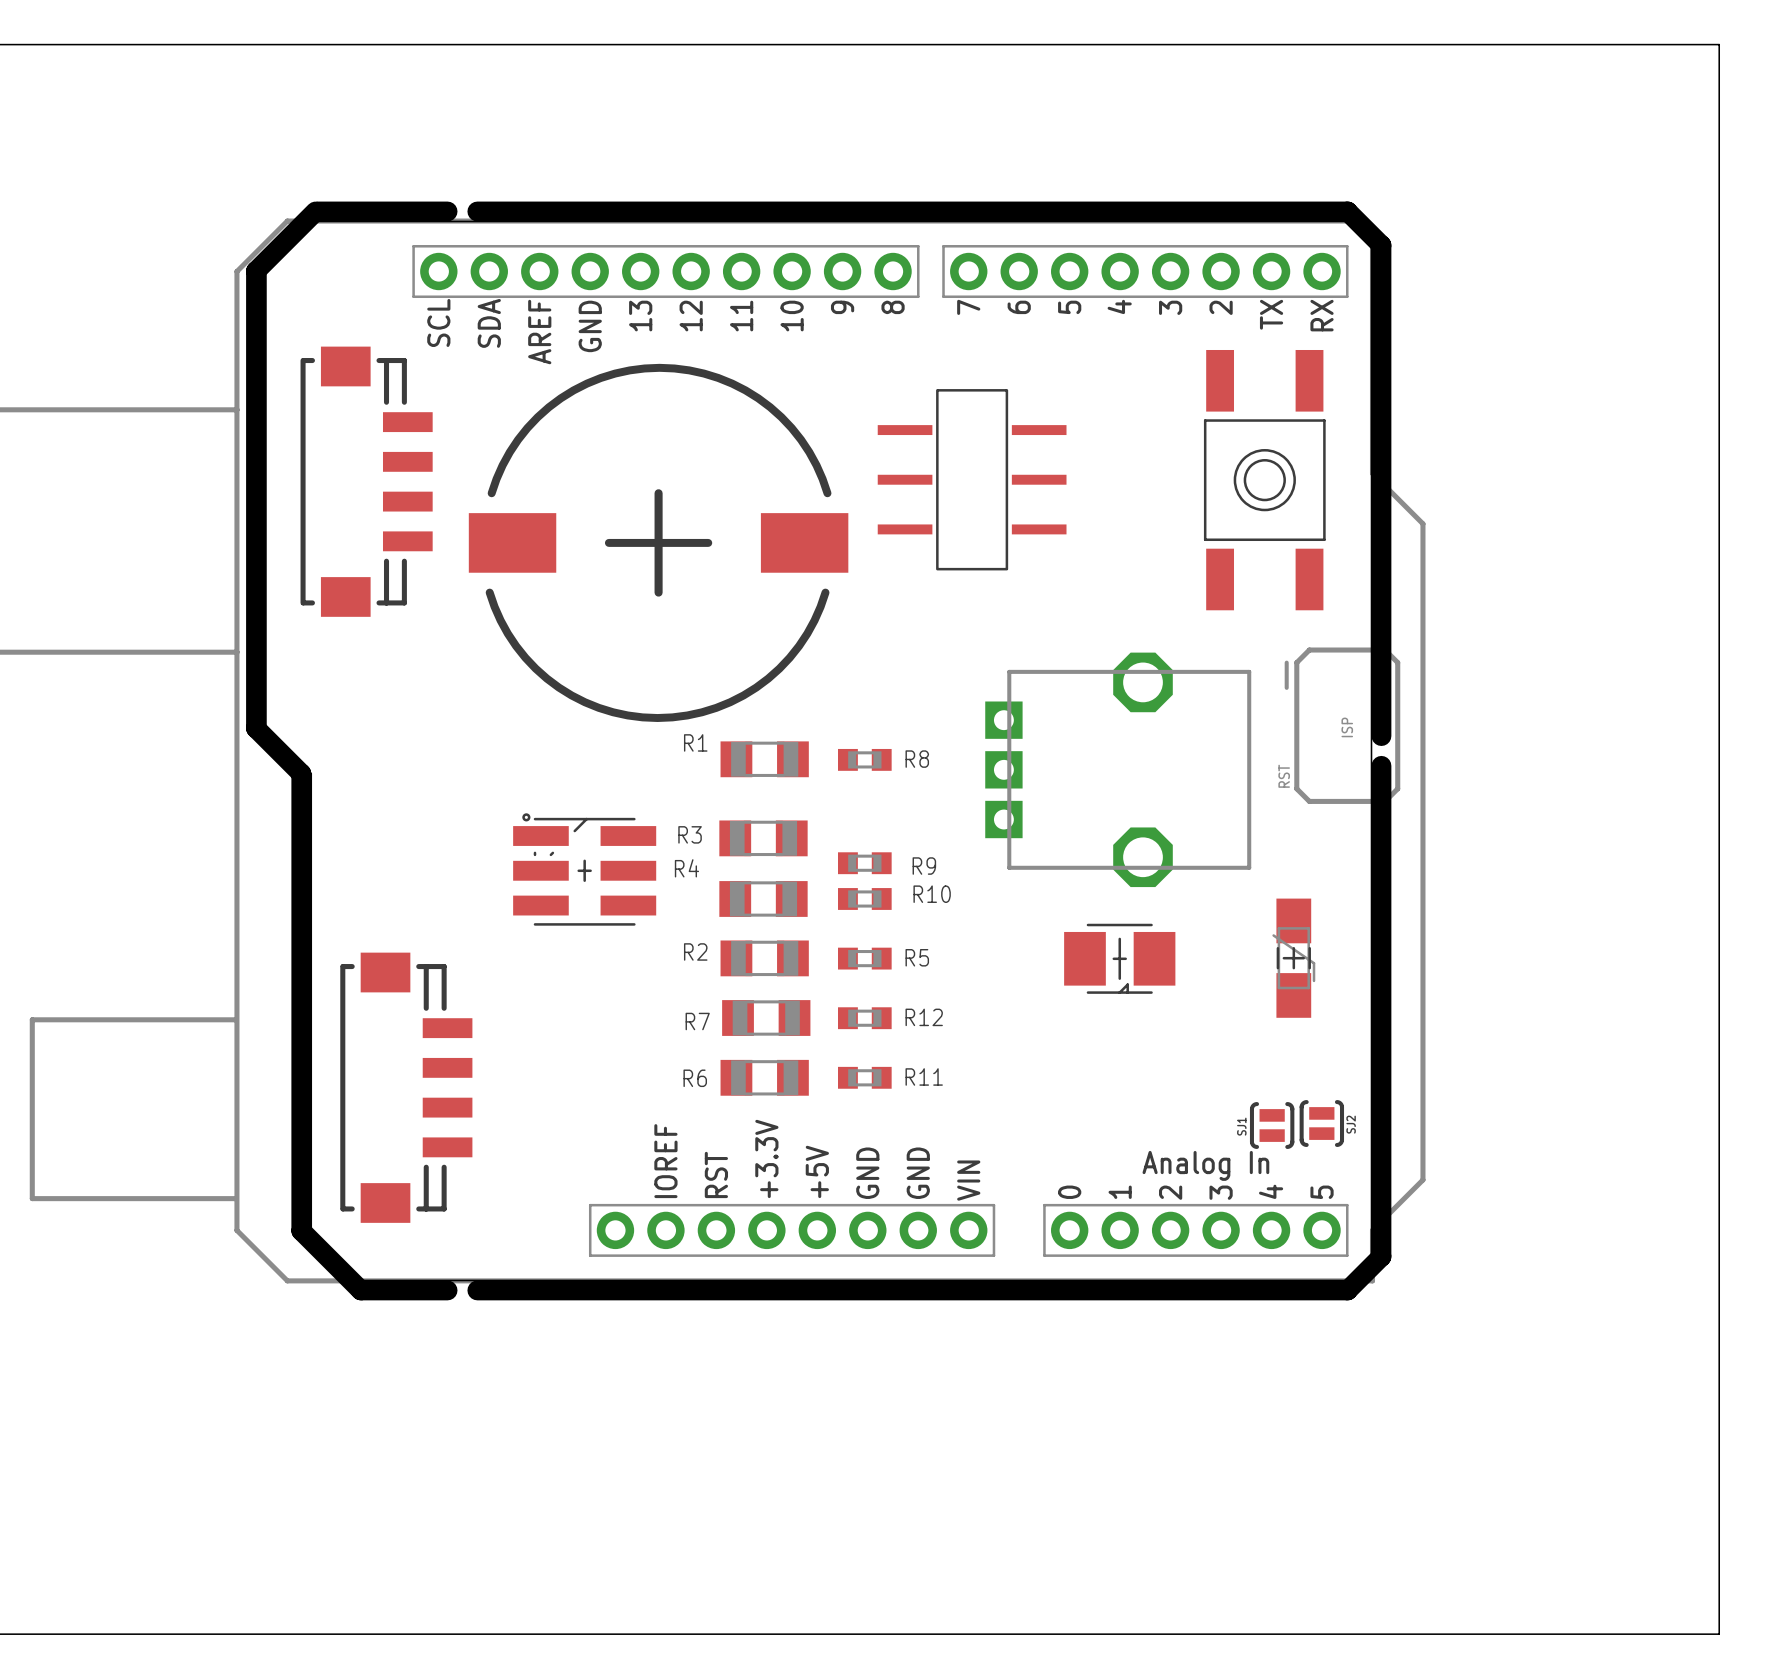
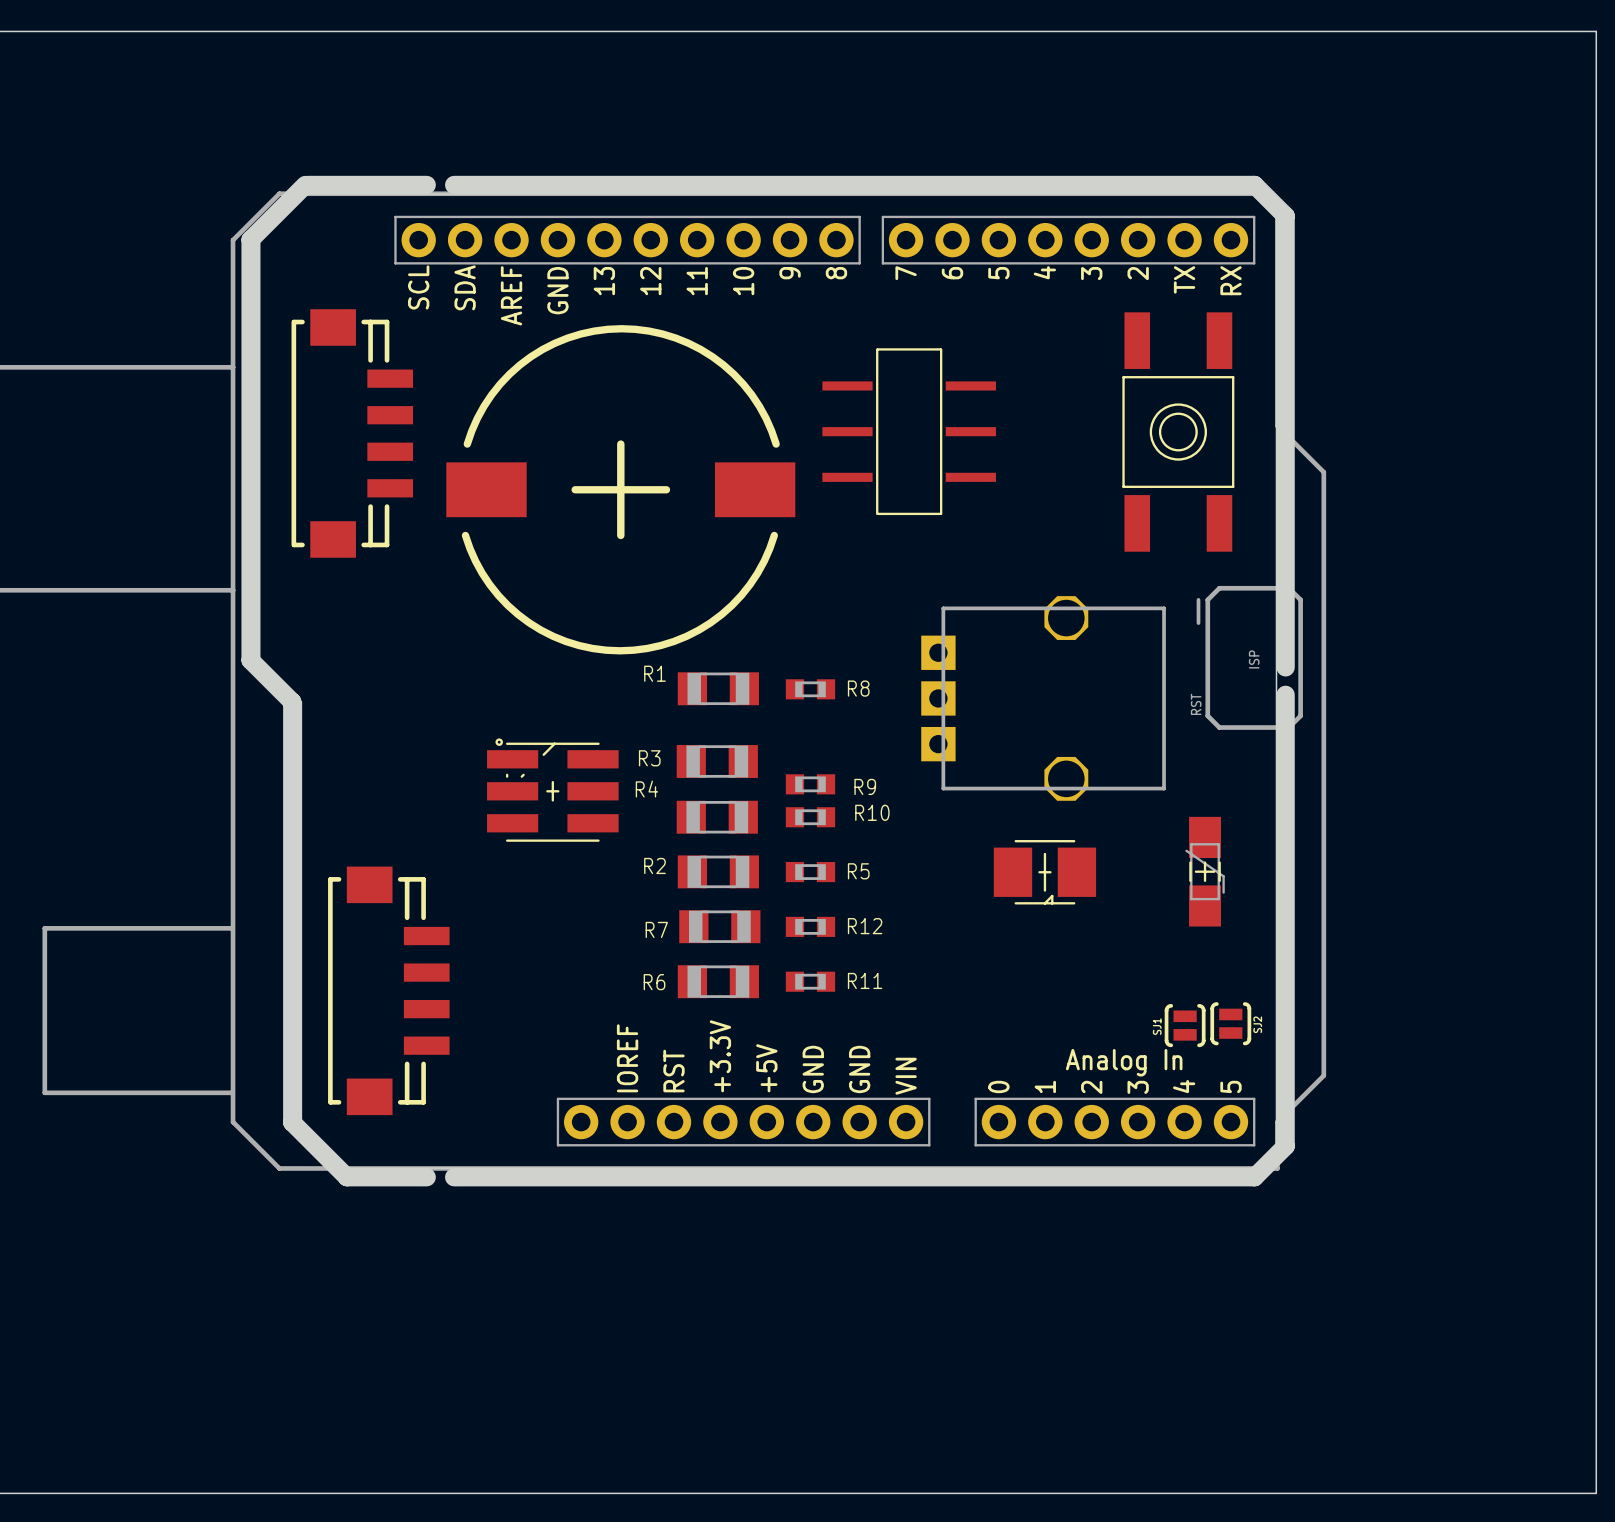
part footprint: [985, 652, 1252, 888] -> [921, 596, 1166, 801]

